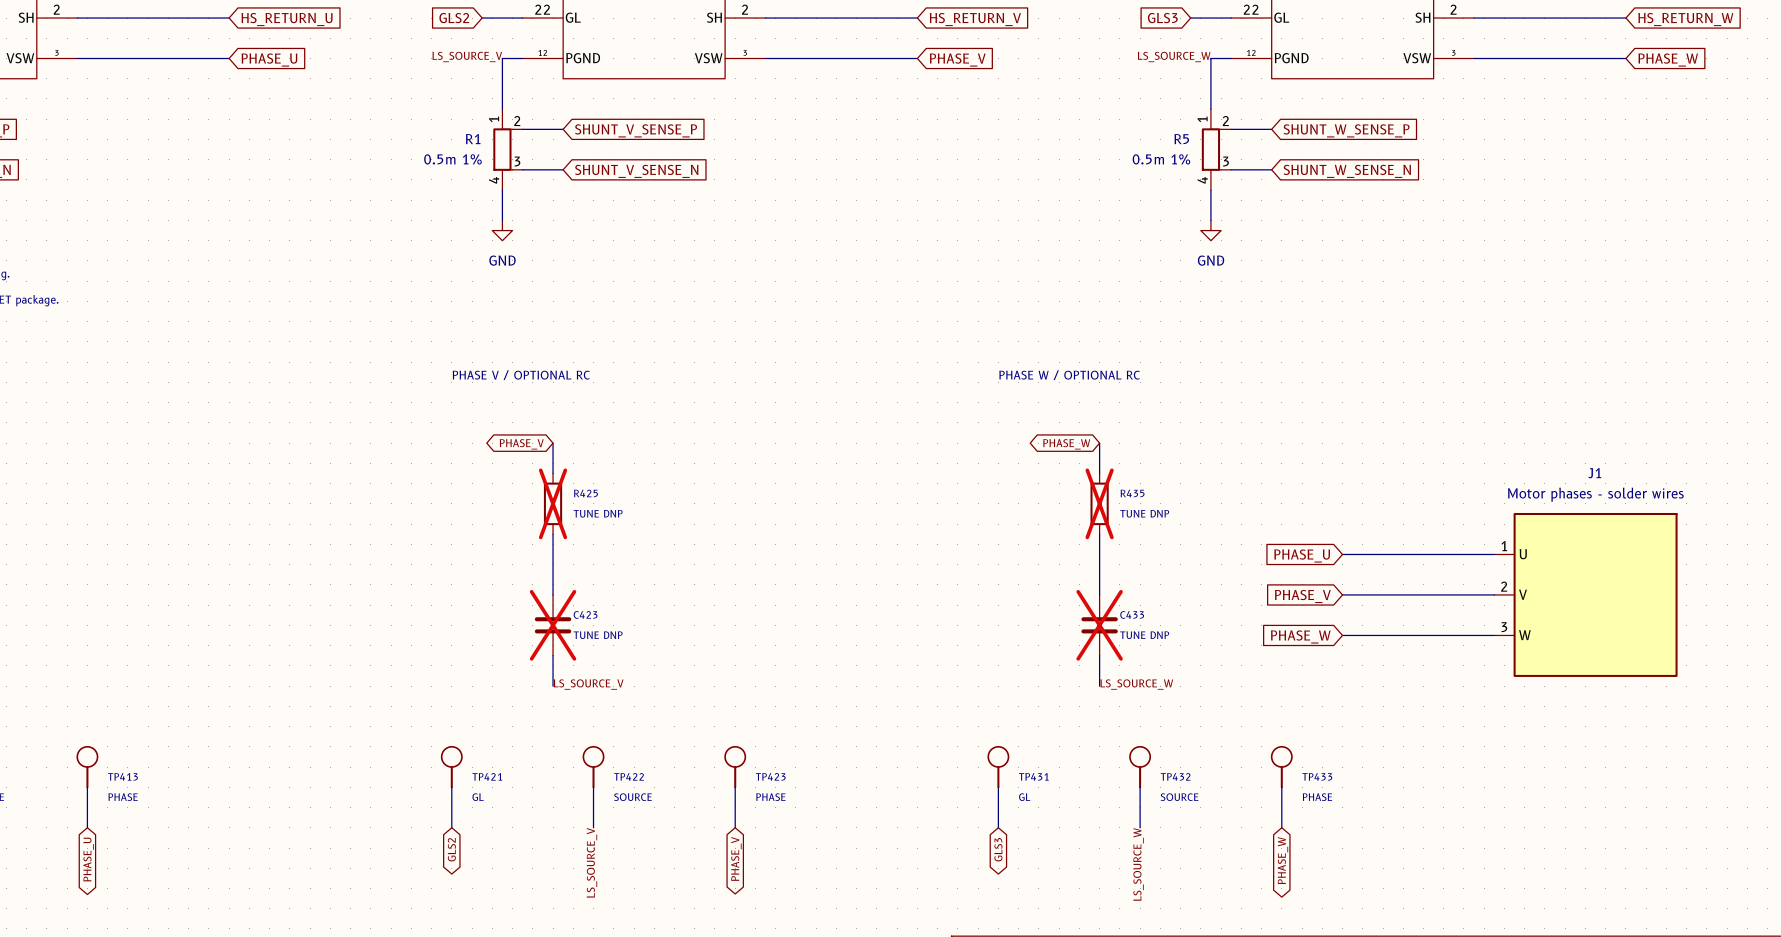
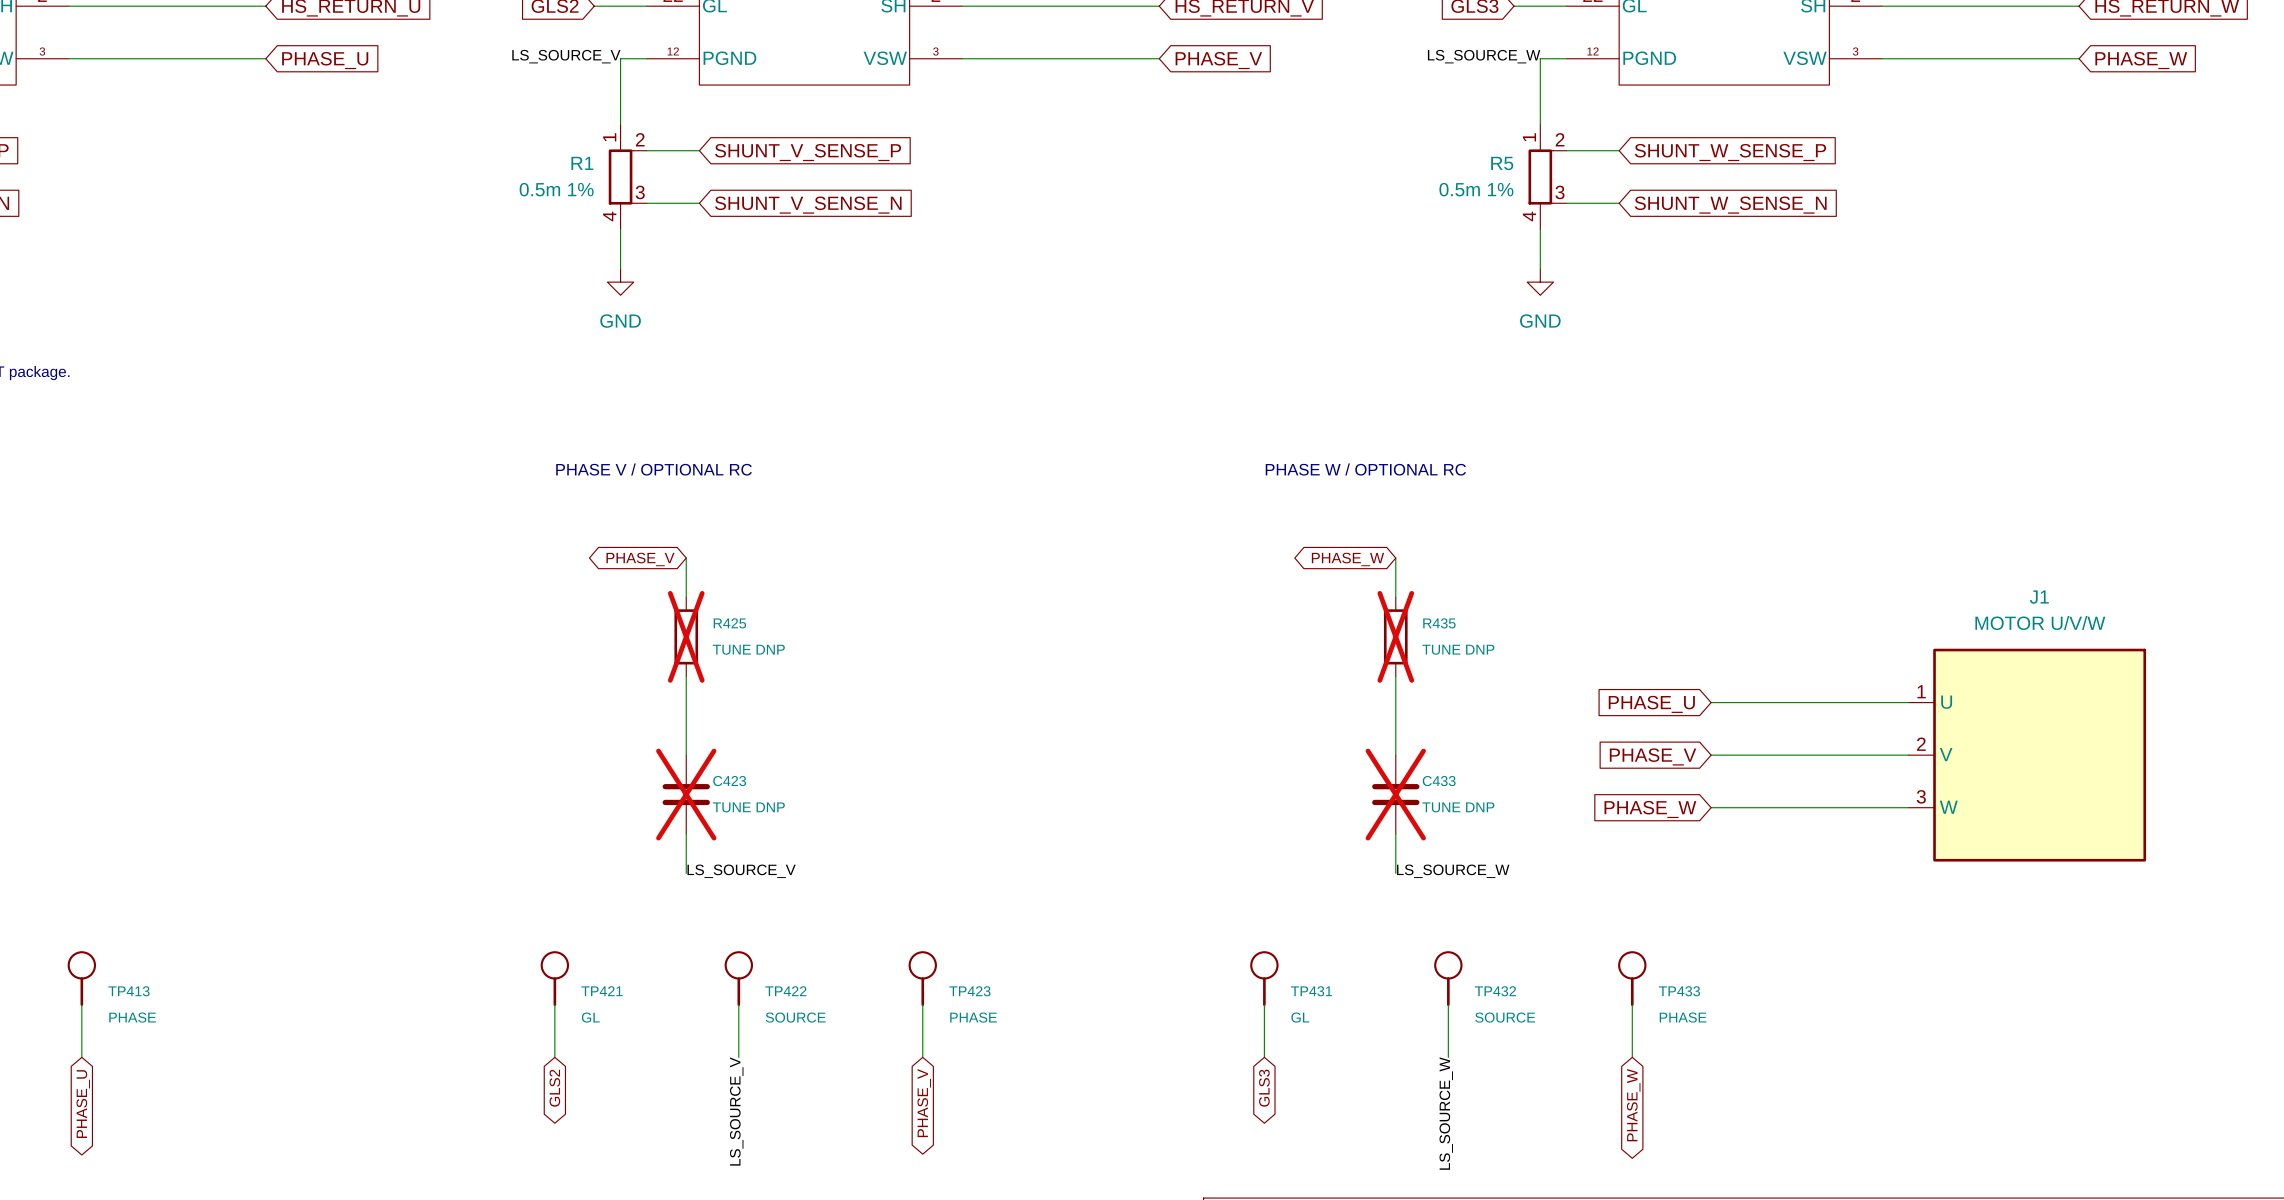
J1 value: Motor phases - solder wires (1595, 494) -> MOTOR U/V/W (2040, 623)

